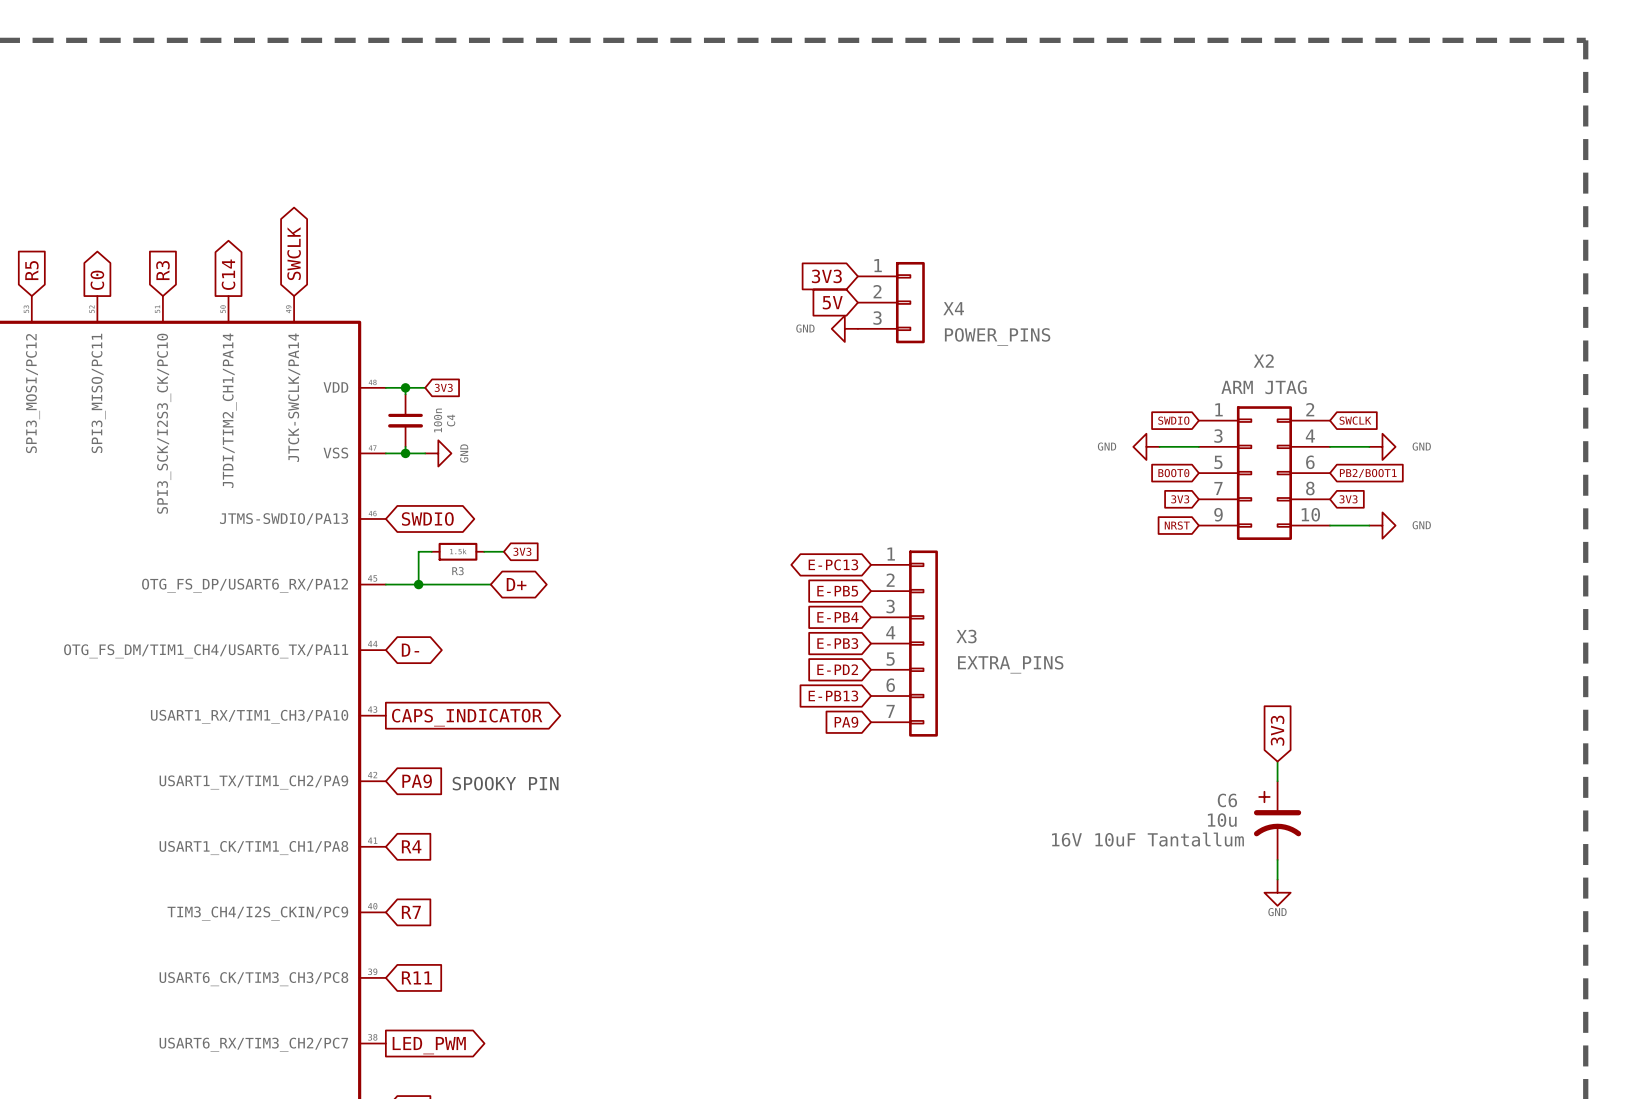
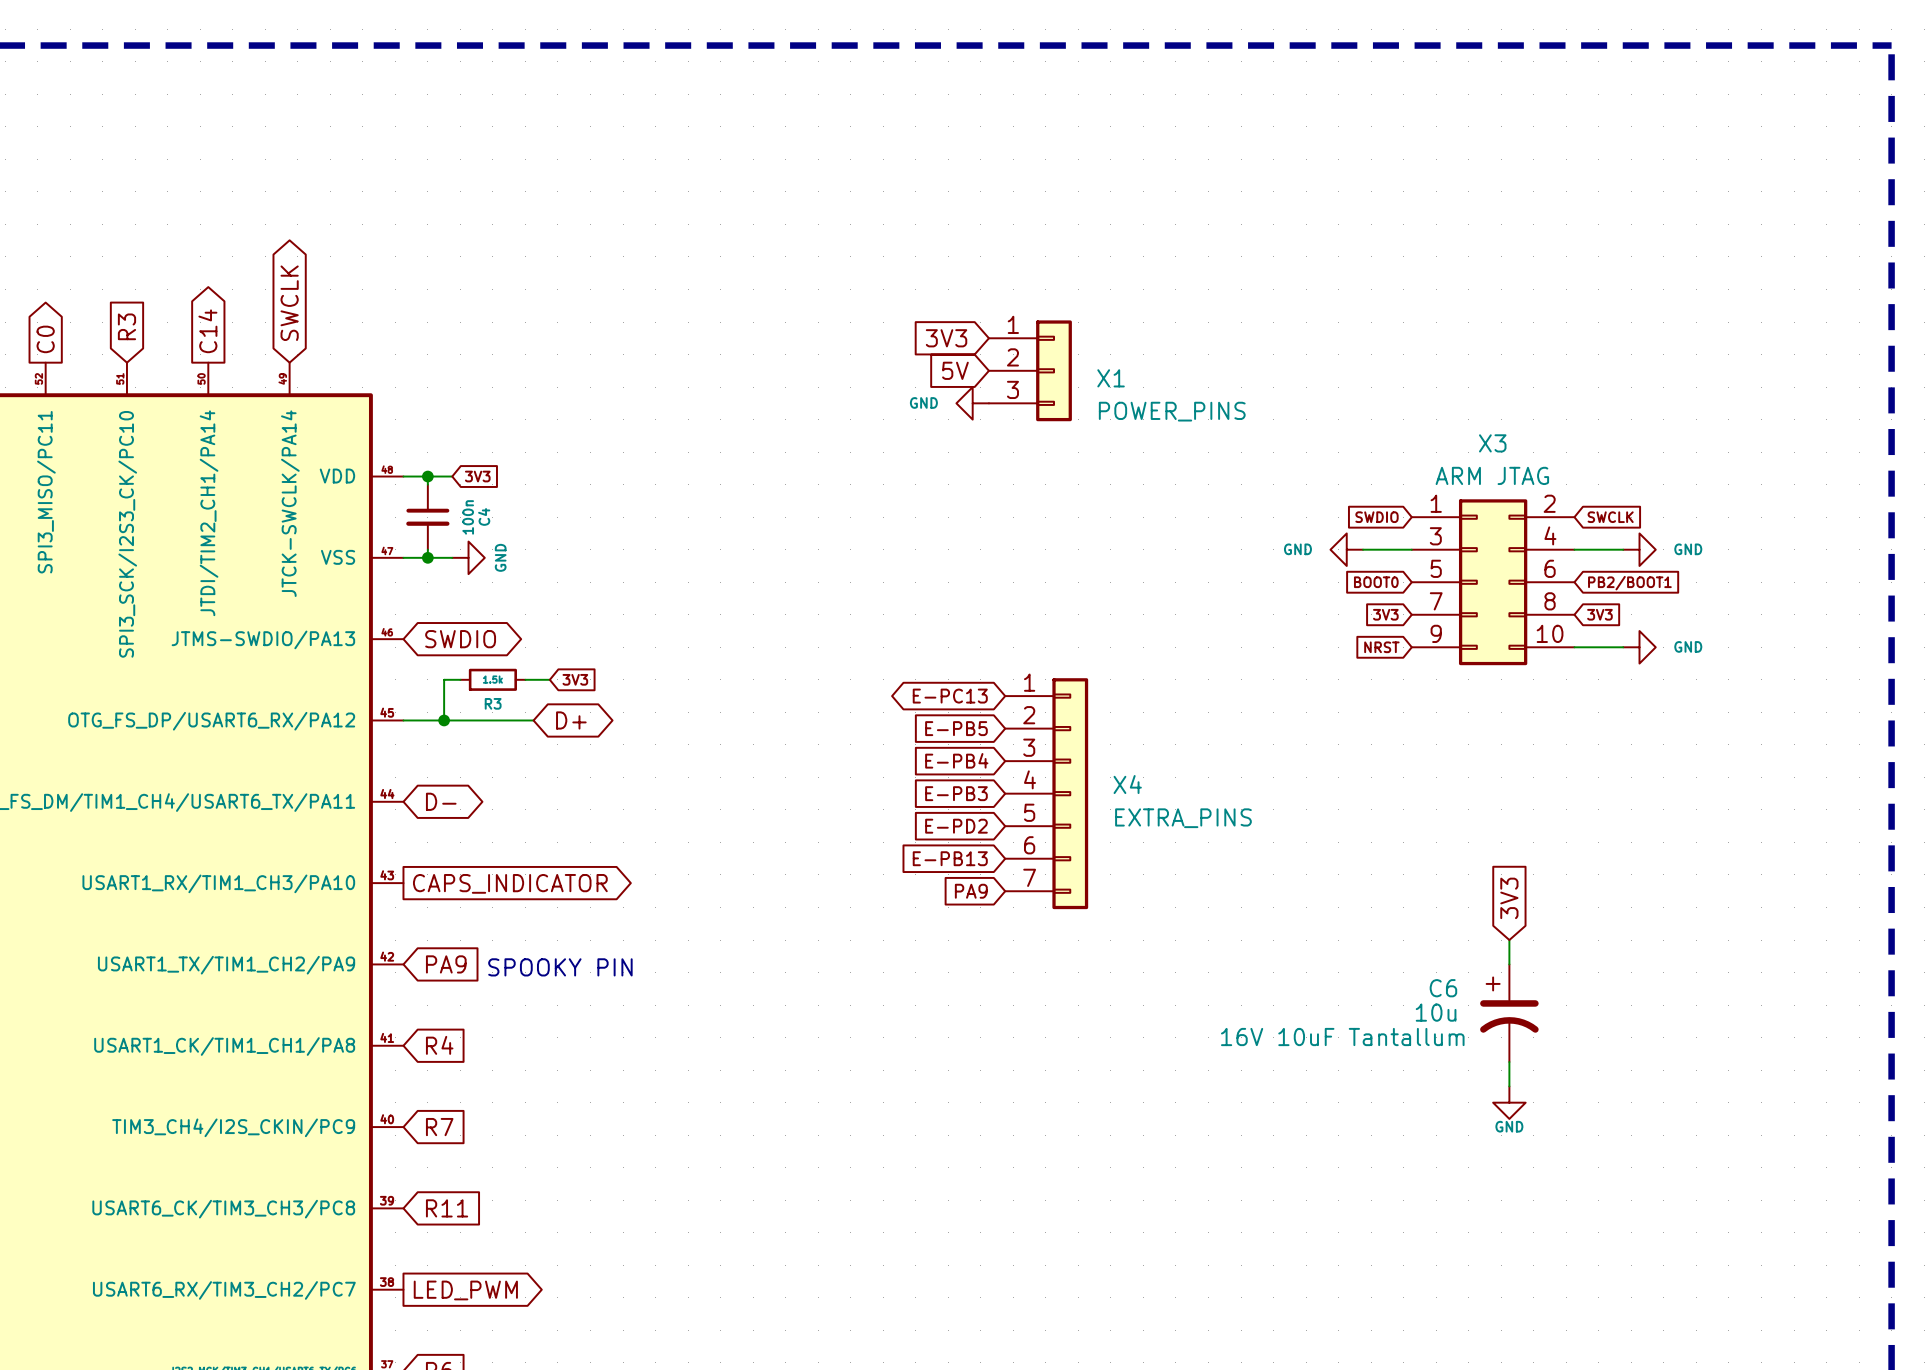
X4 name: X4 (953, 308) -> X1 (1111, 378)
X2 name: X2 (1263, 361) -> X3 (1492, 443)
X3 name: X3 (966, 636) -> X4 (1127, 784)

